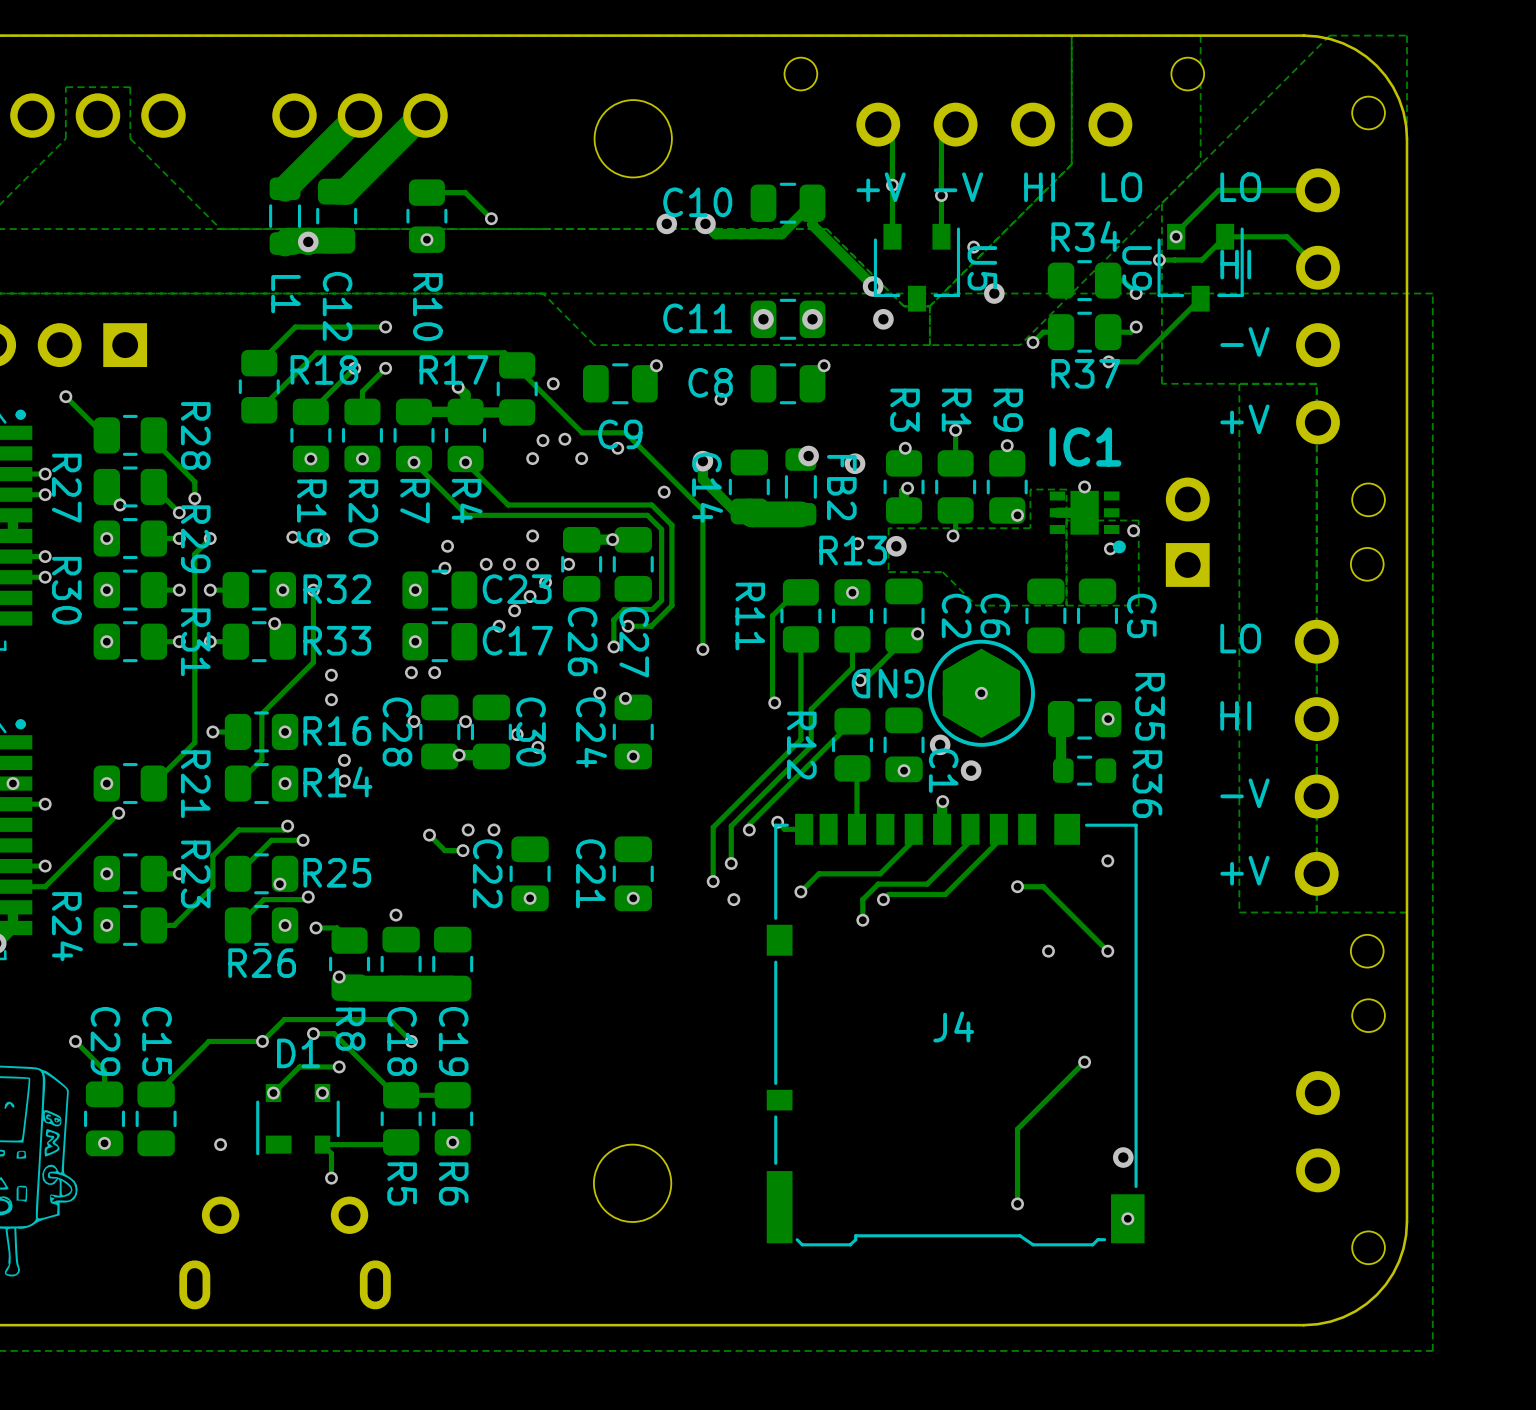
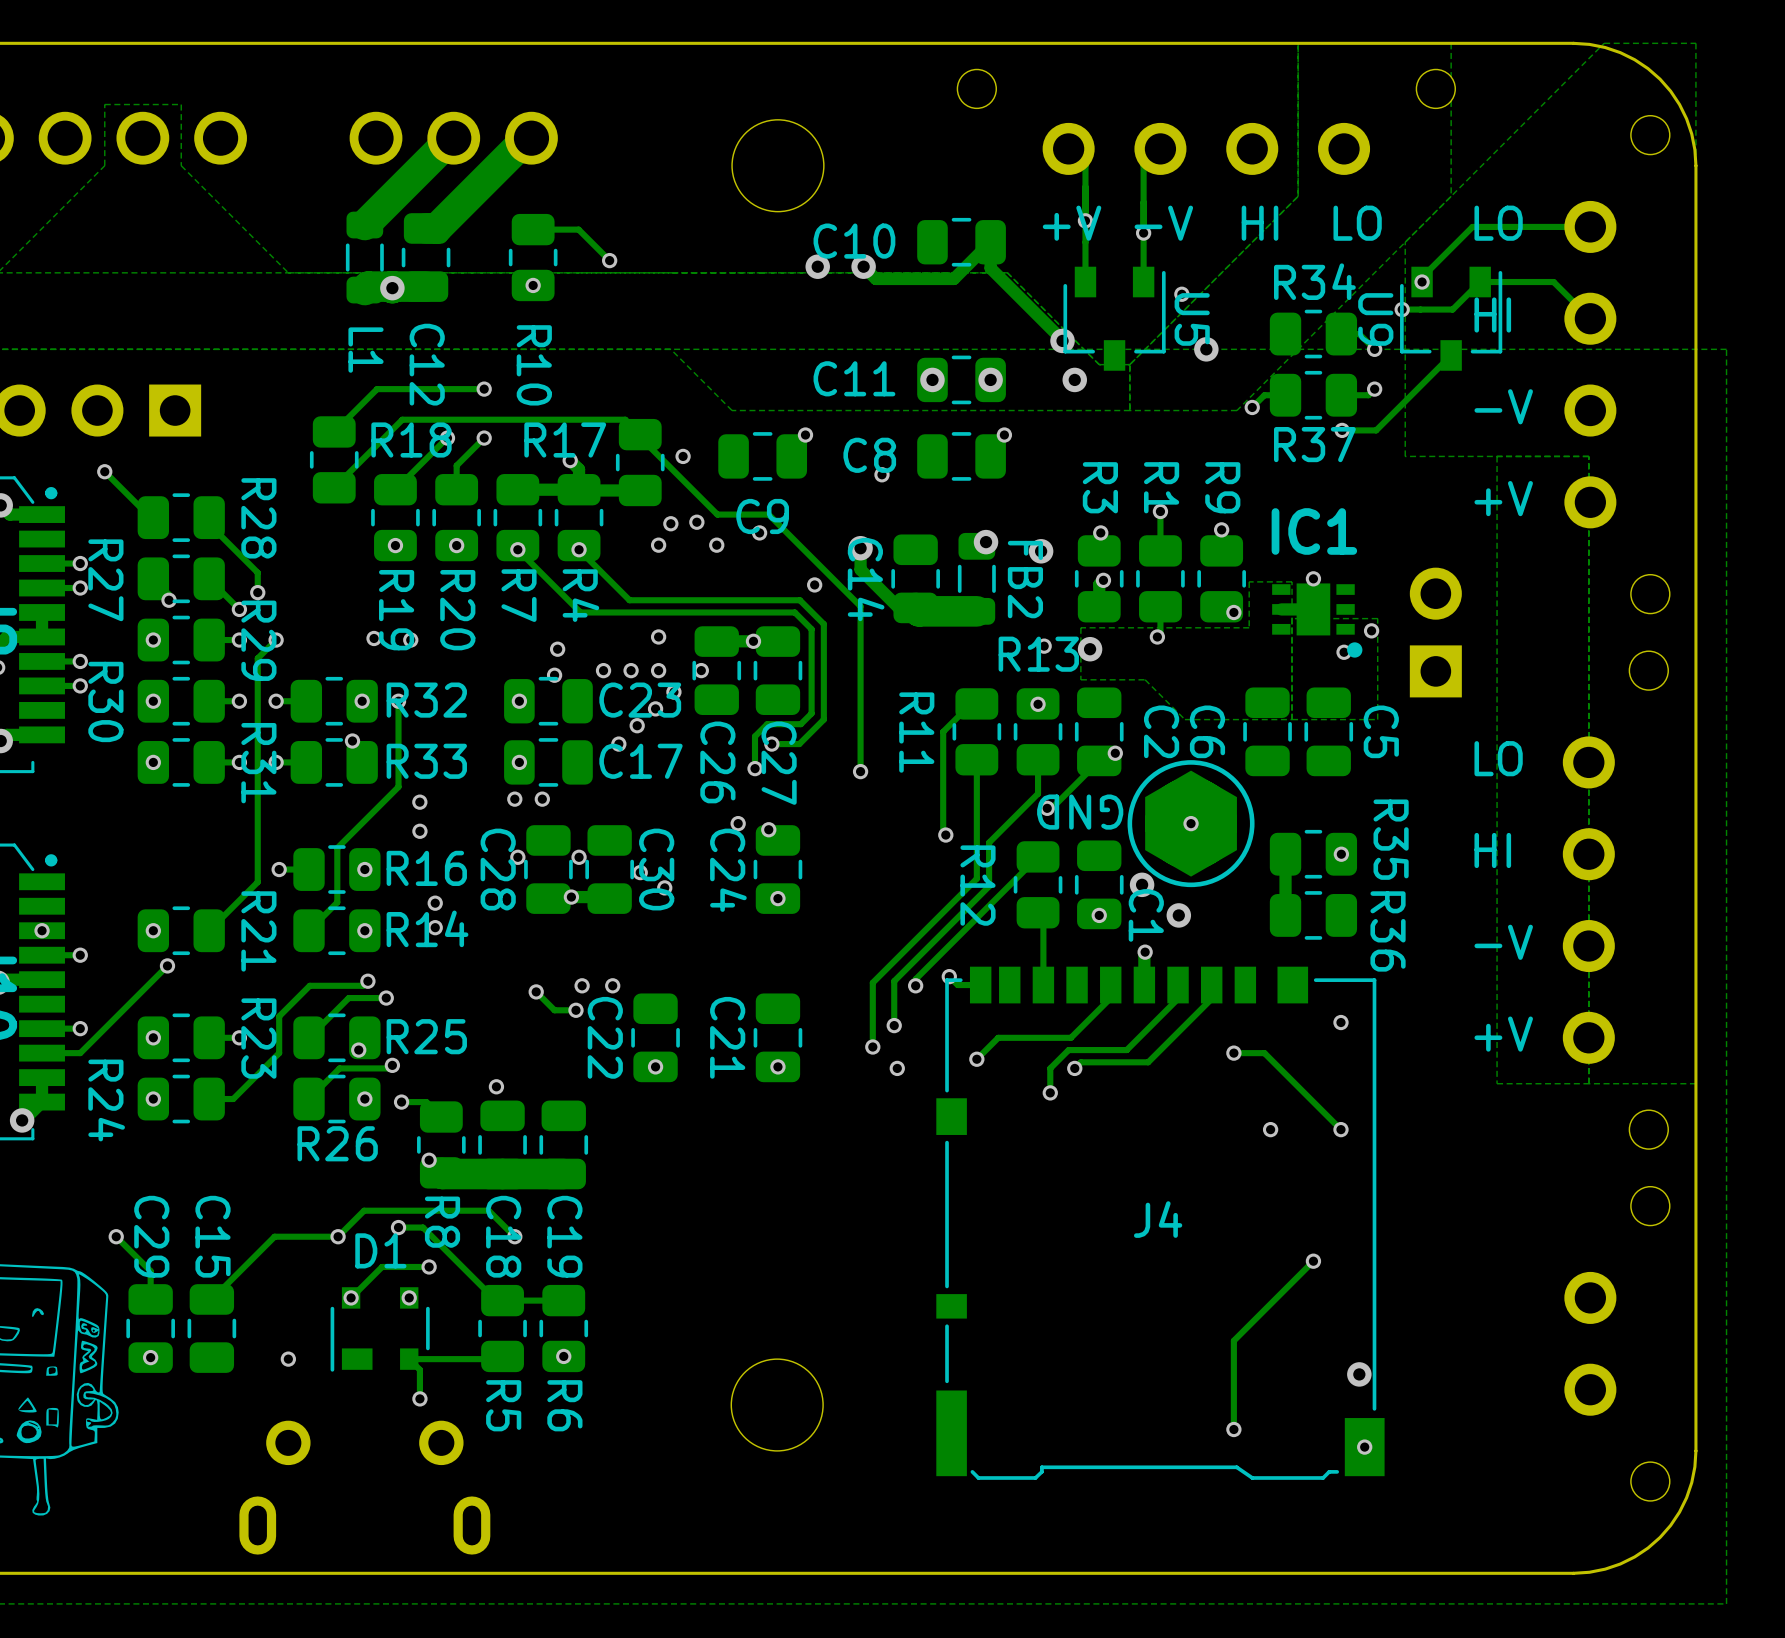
R36 footprint: [1053, 755, 1117, 786] -> [1269, 891, 1358, 940]

